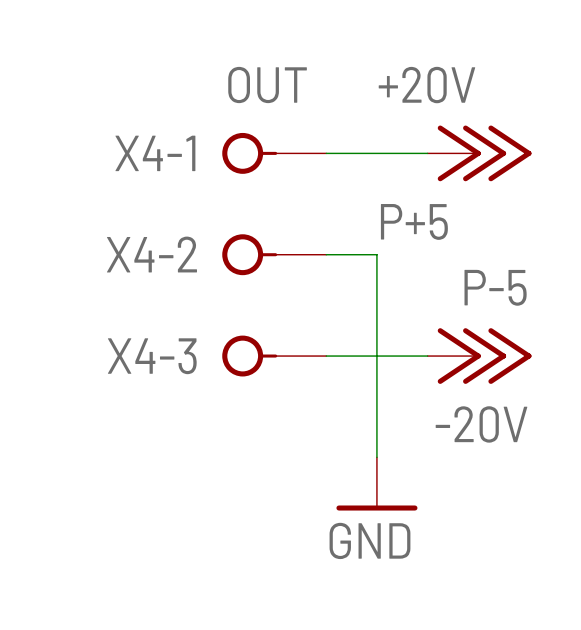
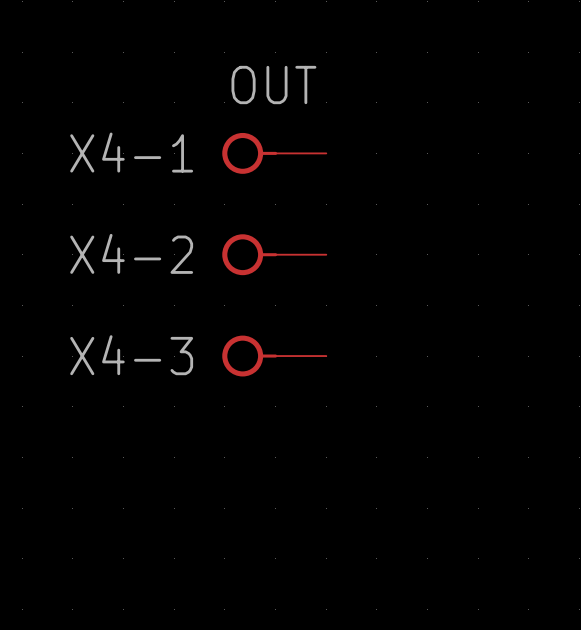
wire: (326, 153) (427, 153) -> none
P+5: +20V (479, 153) -> none
wire: (326, 254) (376, 254) (376, 457) -> none
wire: (326, 356) (427, 356) -> none
P-5: -20V (479, 356) -> none
power symbol: GND (376, 483) -> none

